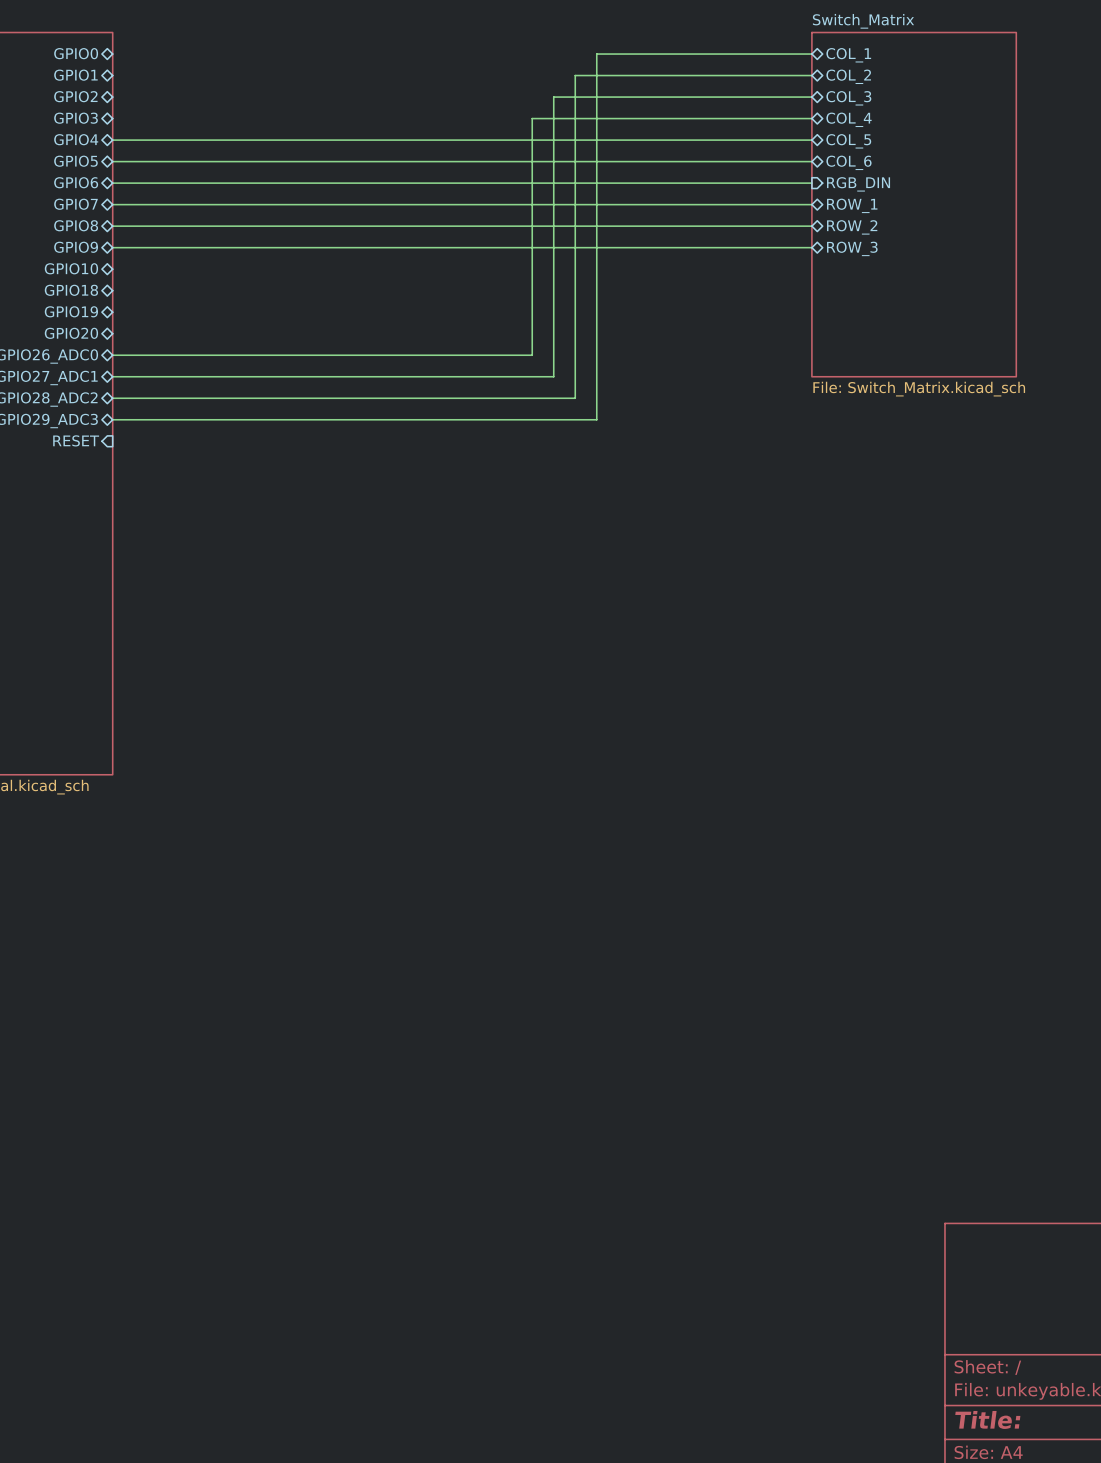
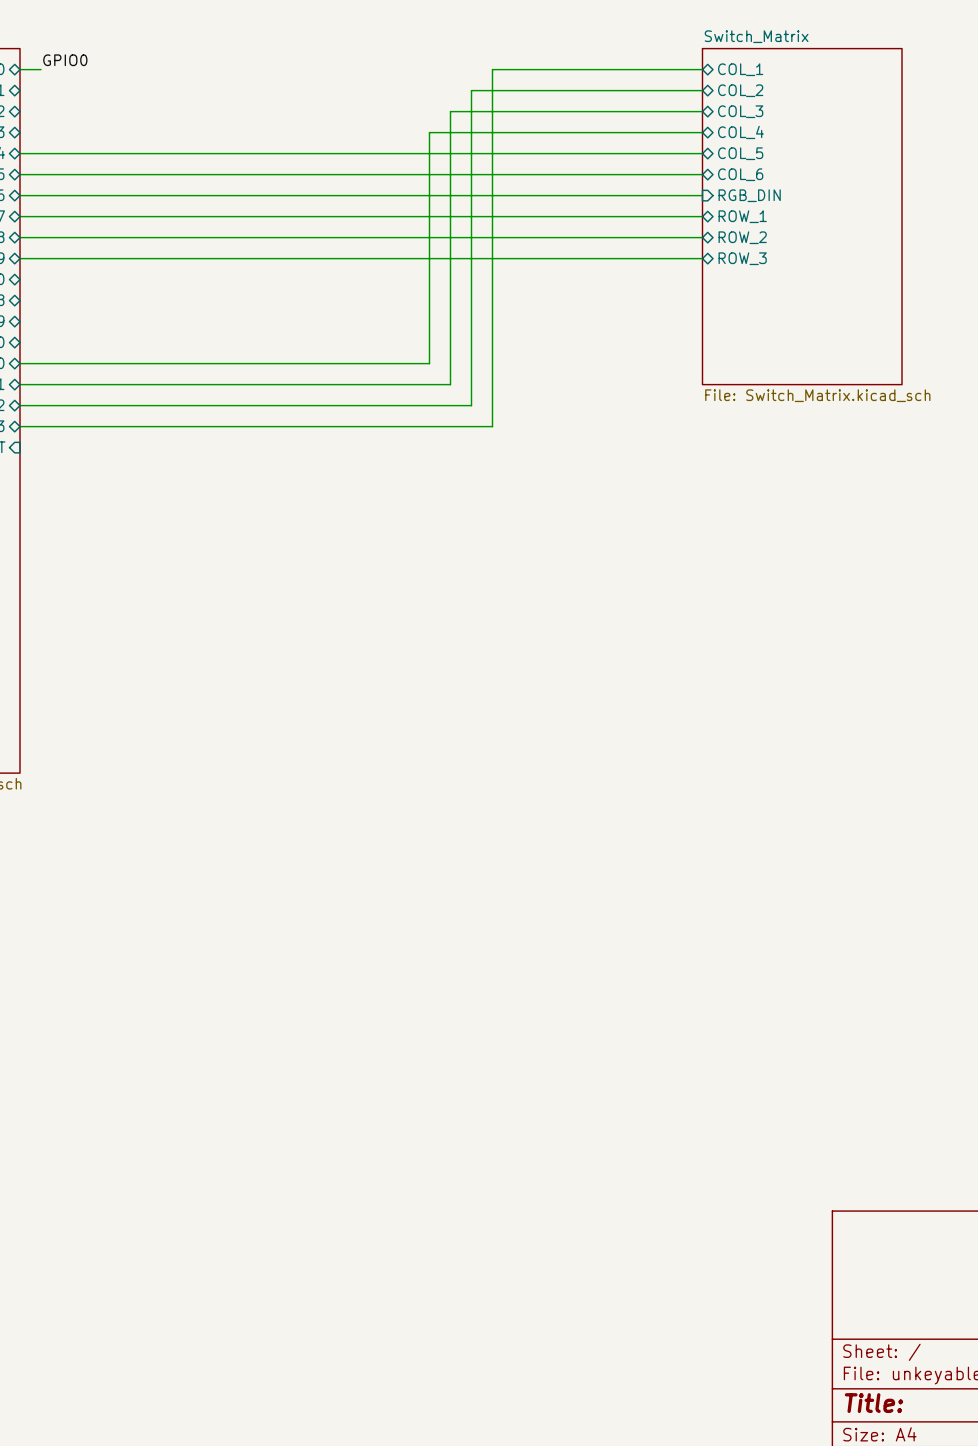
label: none -> GPIO0 (65, 60)
wire: none -> (19, 69) (40, 69)

